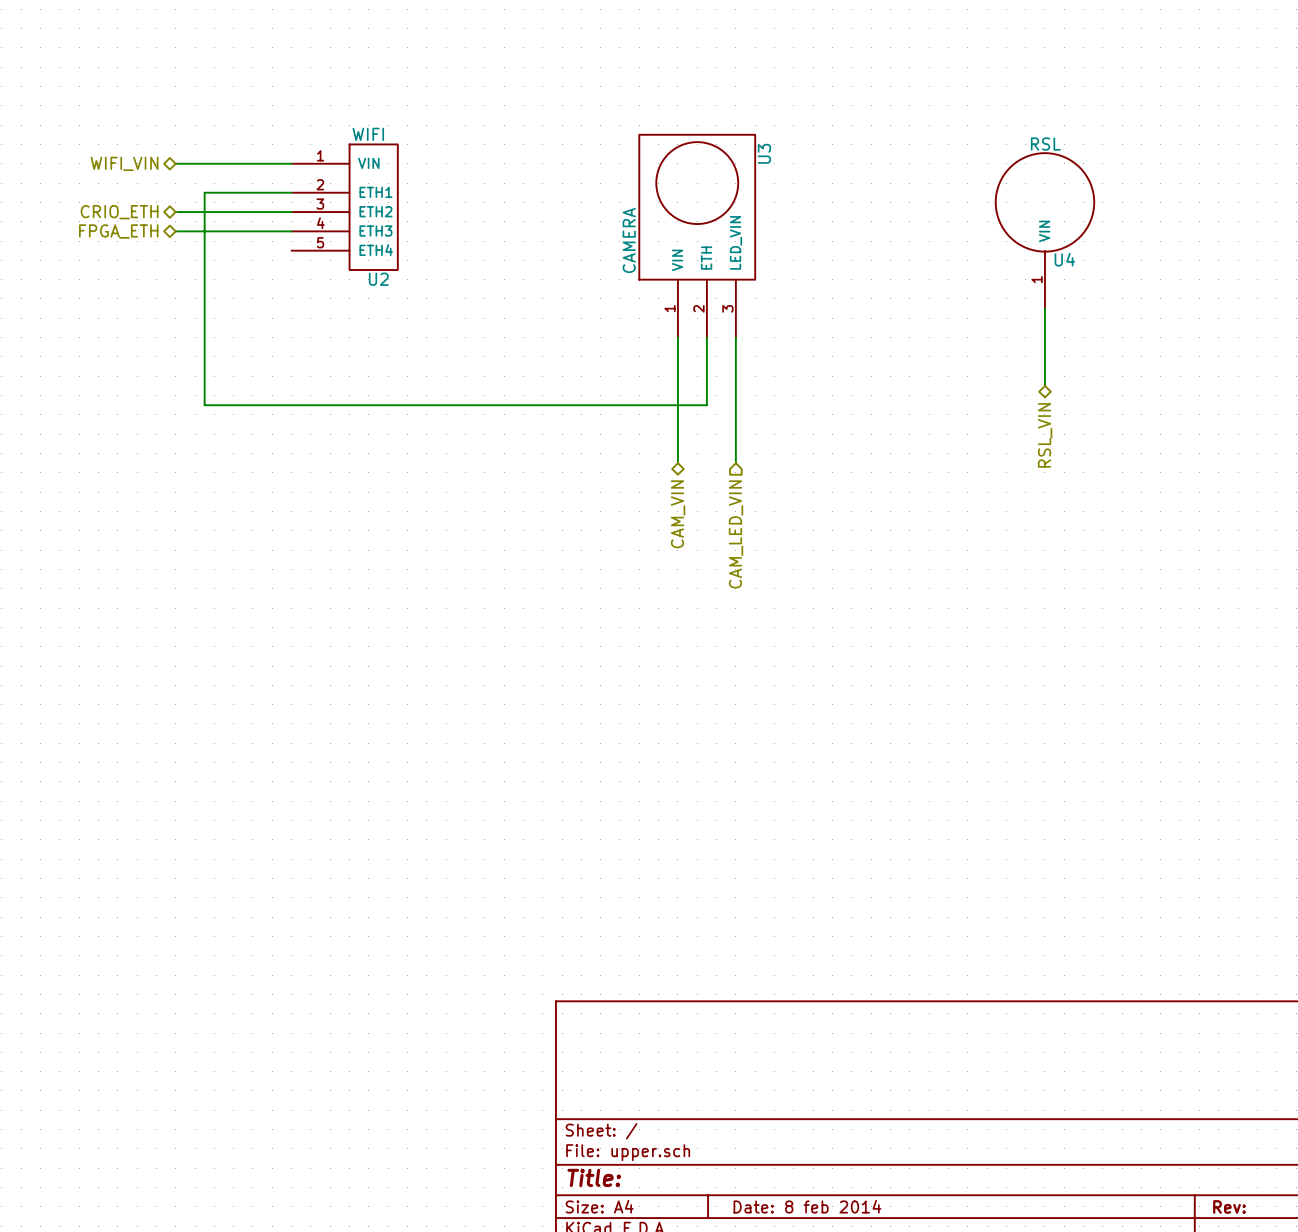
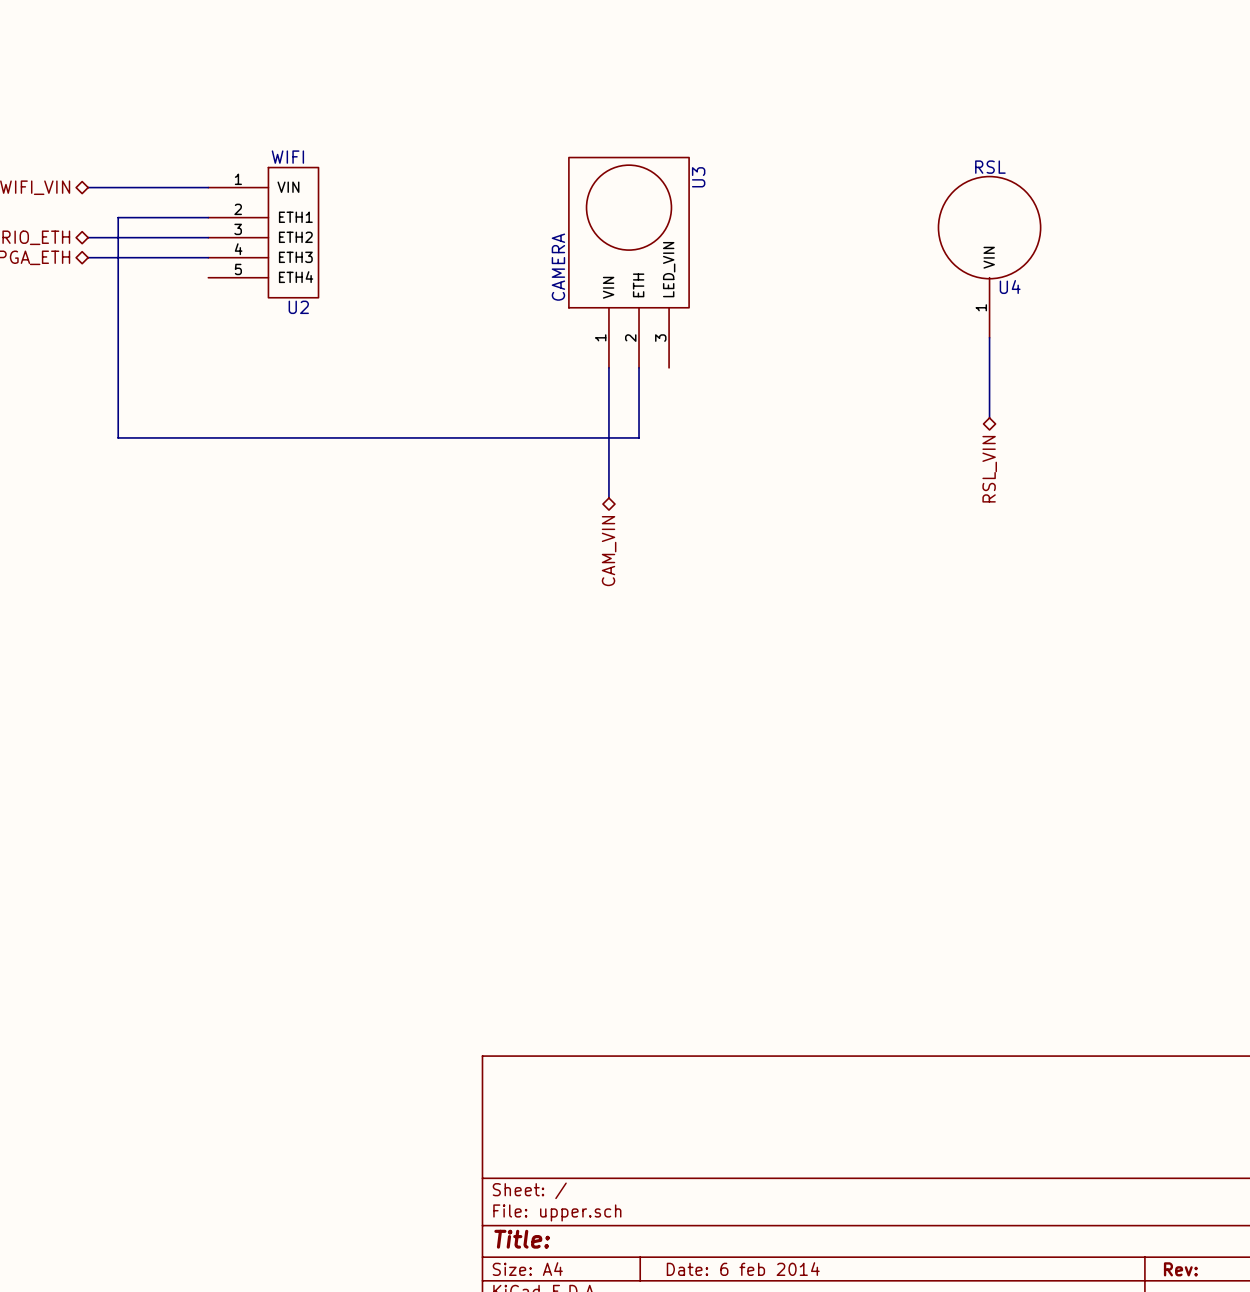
wire: (735, 337) (735, 463) -> none
hierarchical label: CAM_LED_VIN (736, 534) -> none
title block: Date: 8 feb 2014 (807, 1206) -> Date: 6 feb 2014 (743, 1269)

